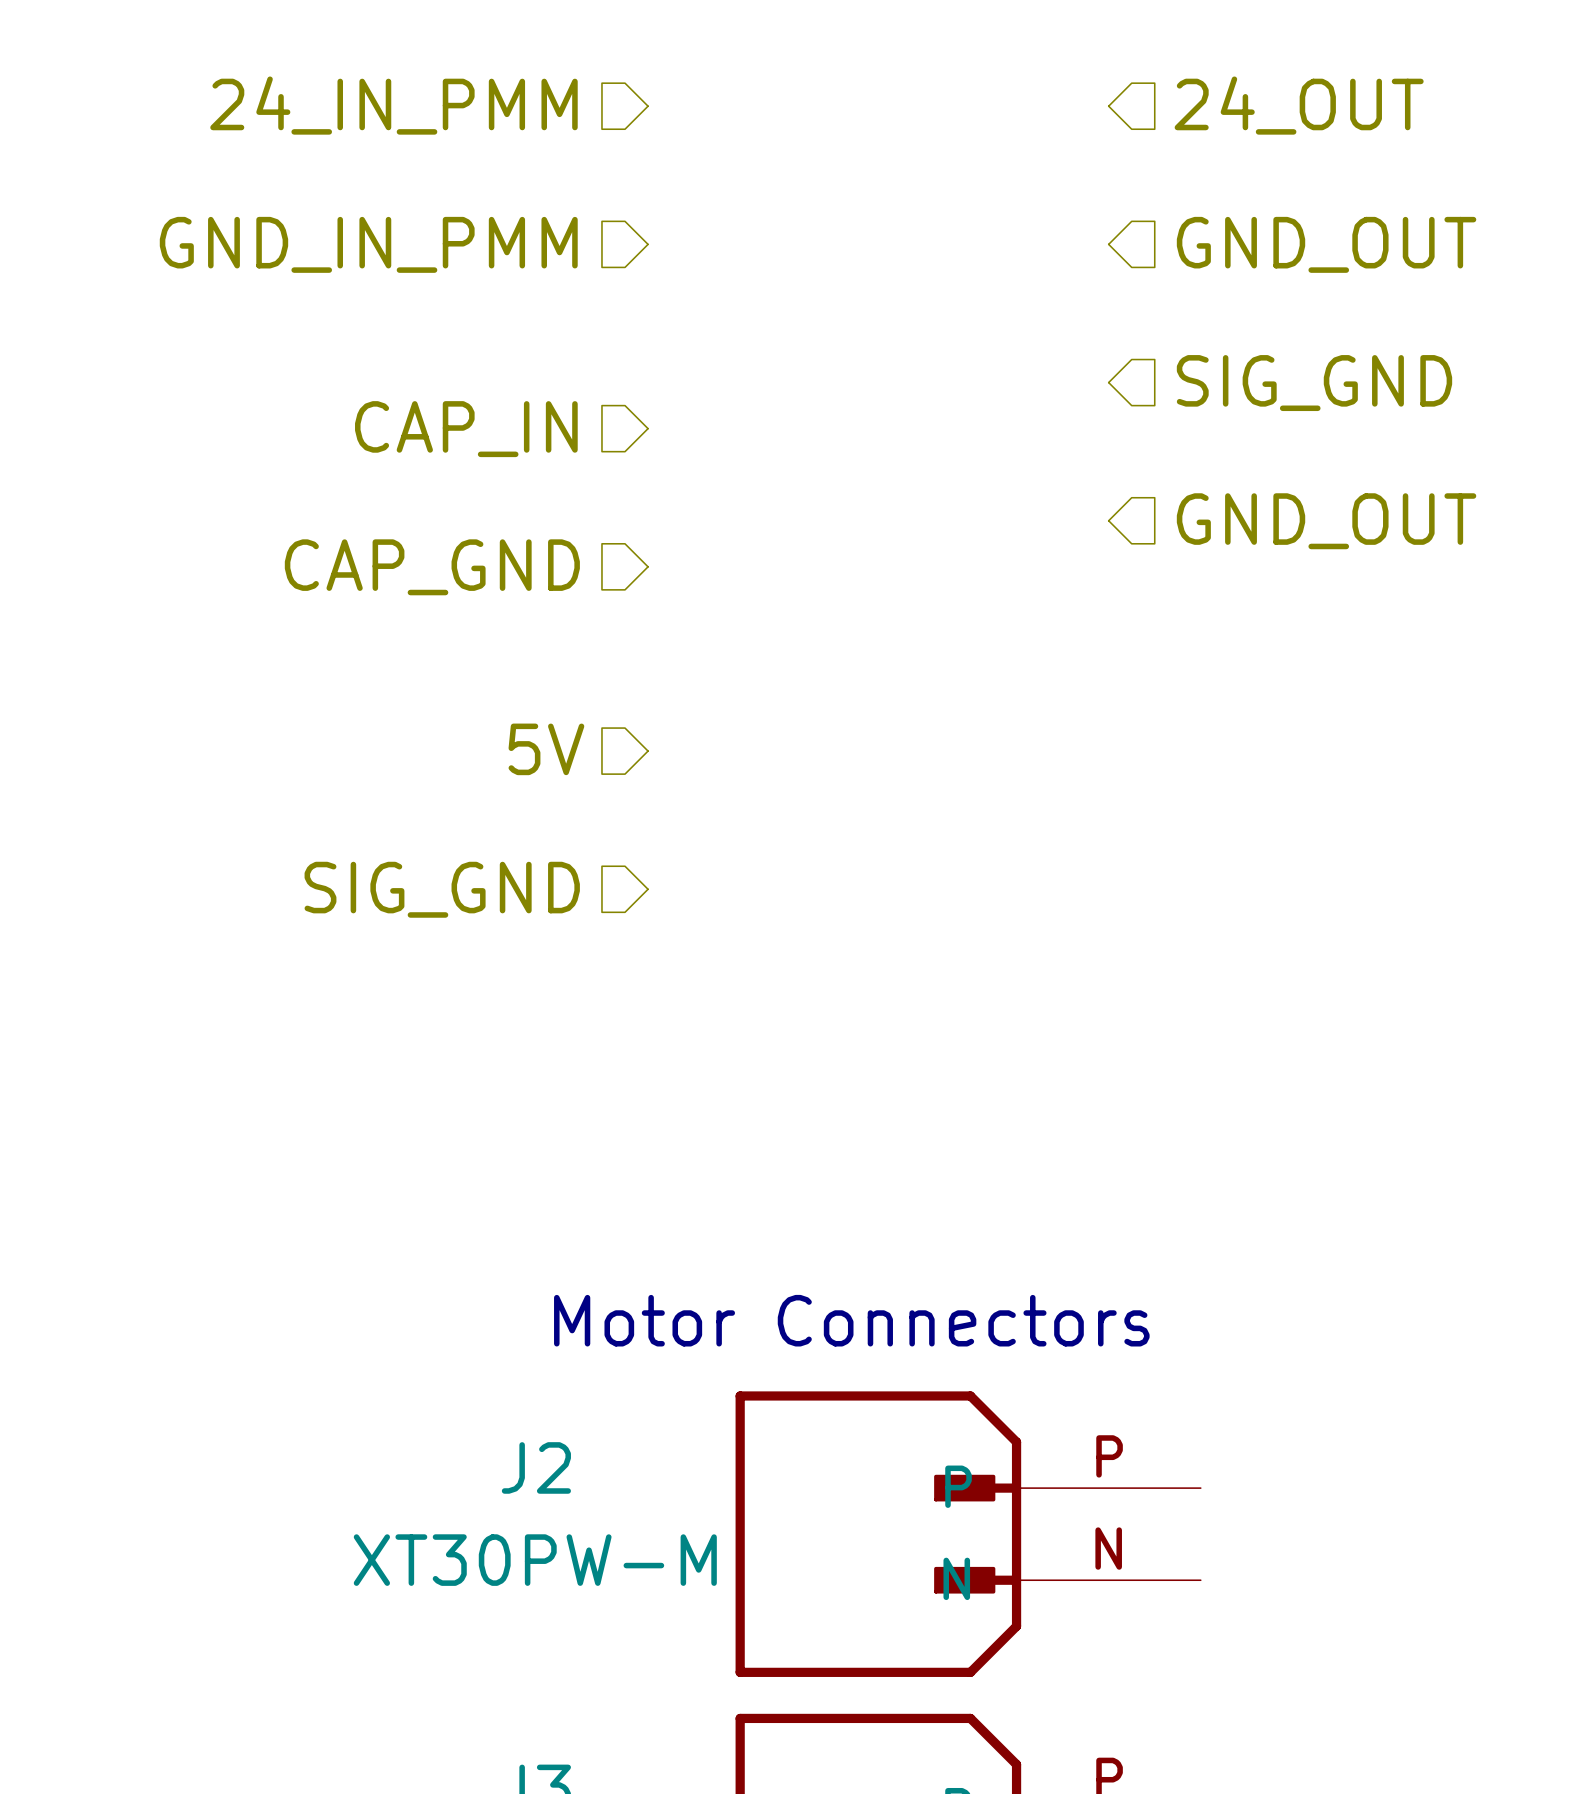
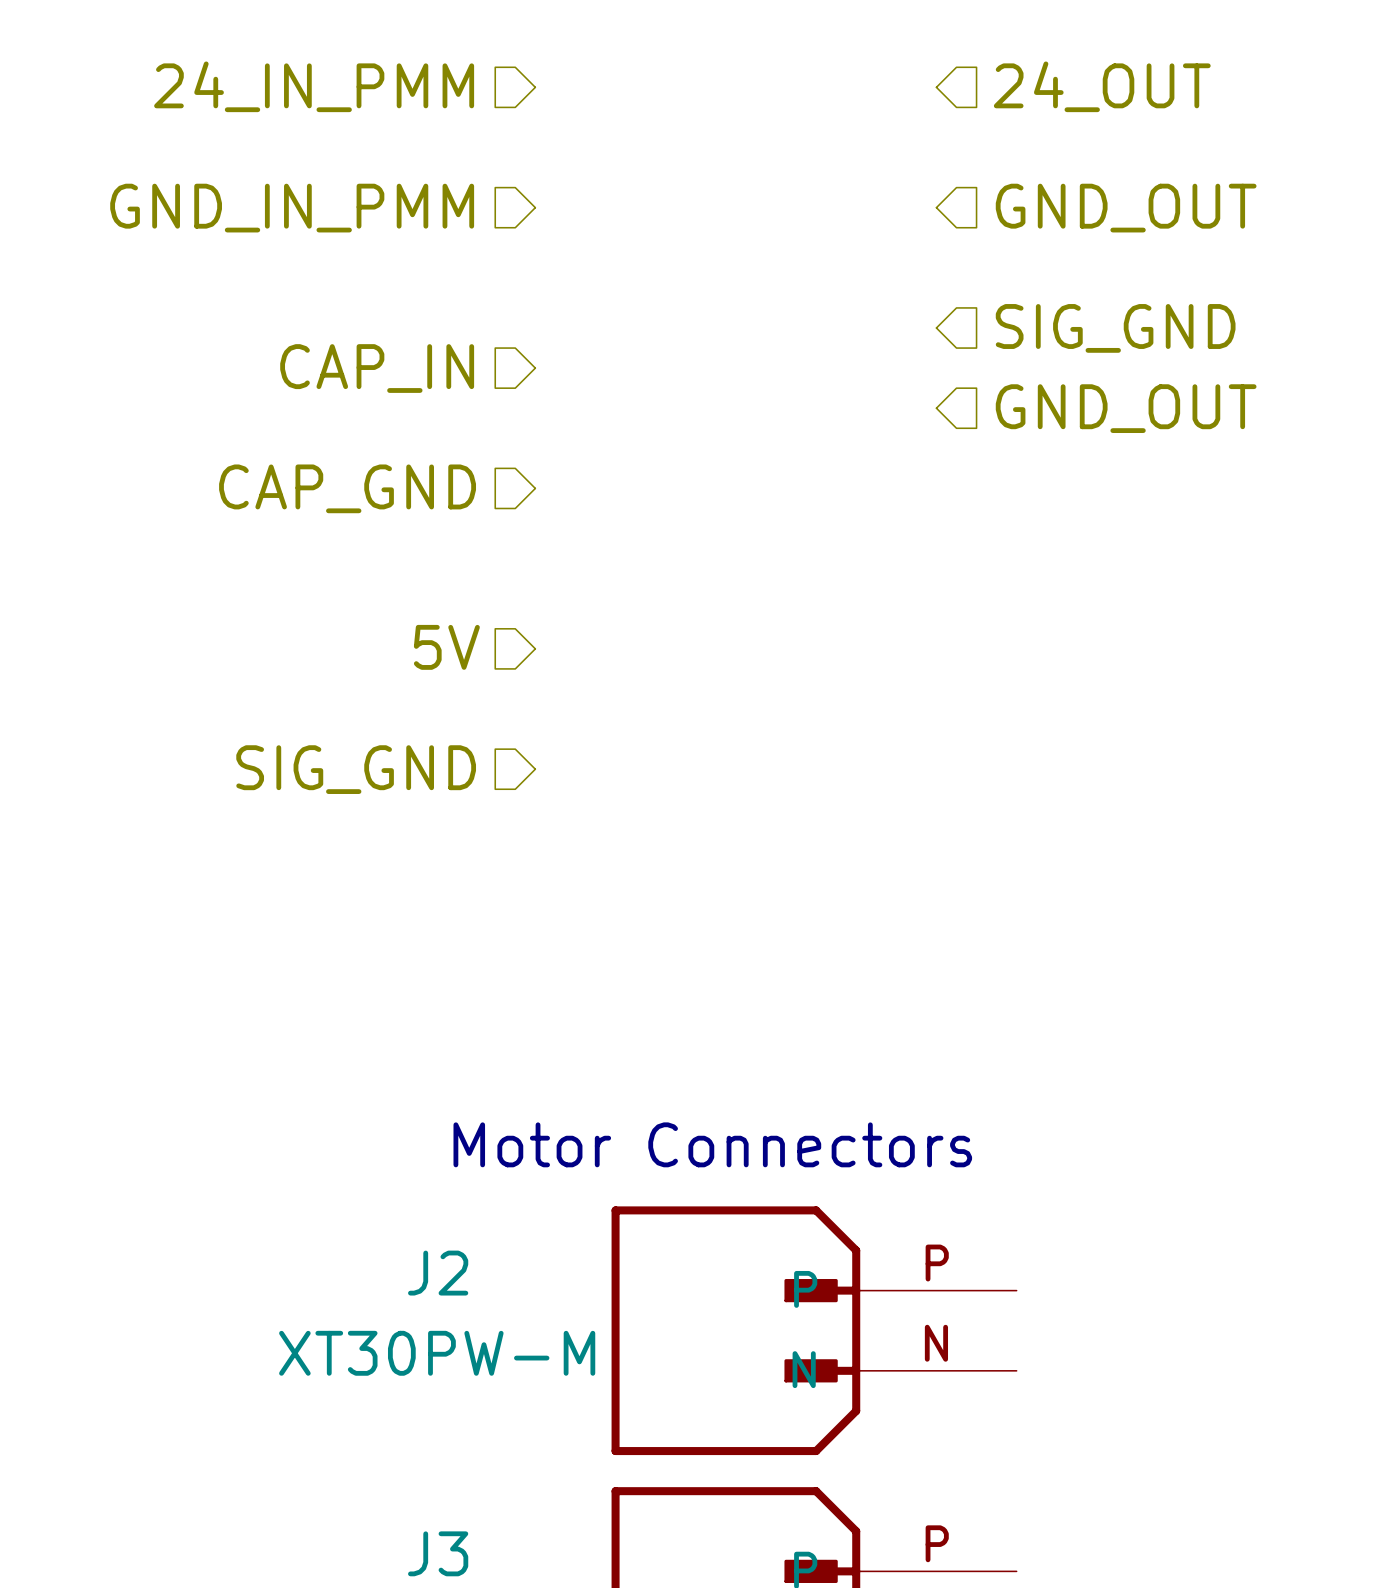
hierarchical label position: GND_OUT (1326, 521) -> GND_OUT (1126, 408)

